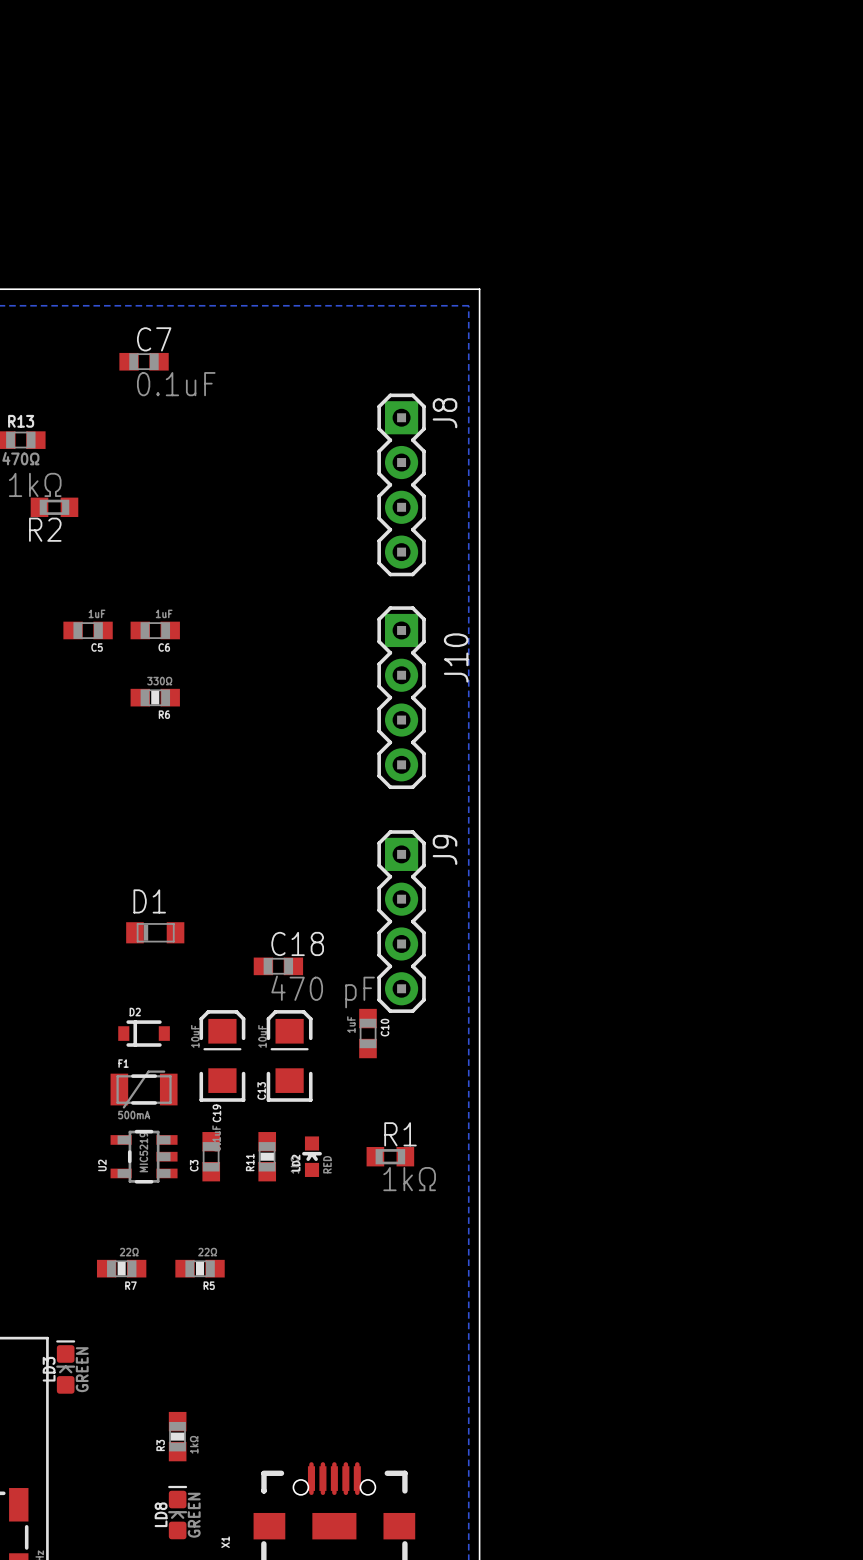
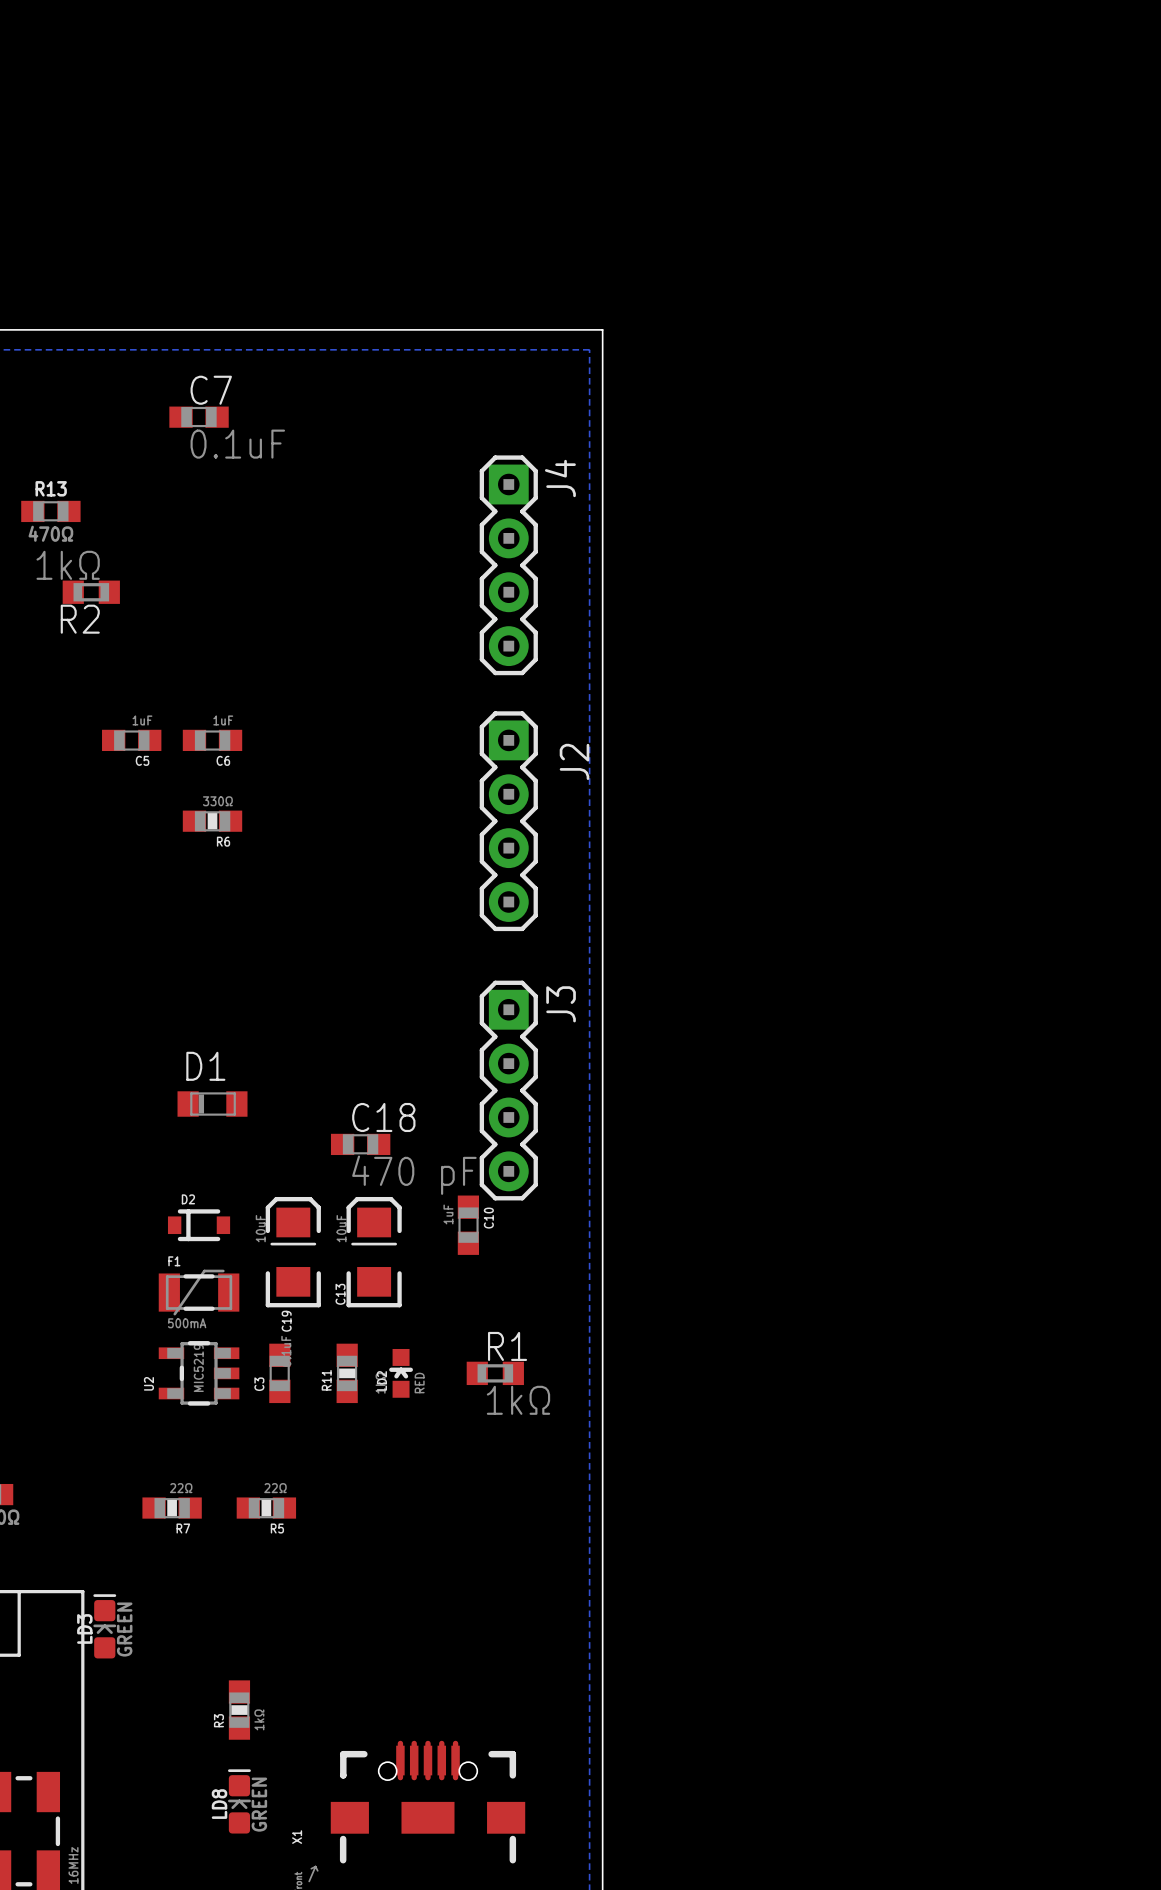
J8 name: J8 (445, 413) -> J4 (560, 478)
J10 name: J10 (456, 657) -> J2 (574, 761)
J9 name: J9 (445, 849) -> J3 (561, 1004)

